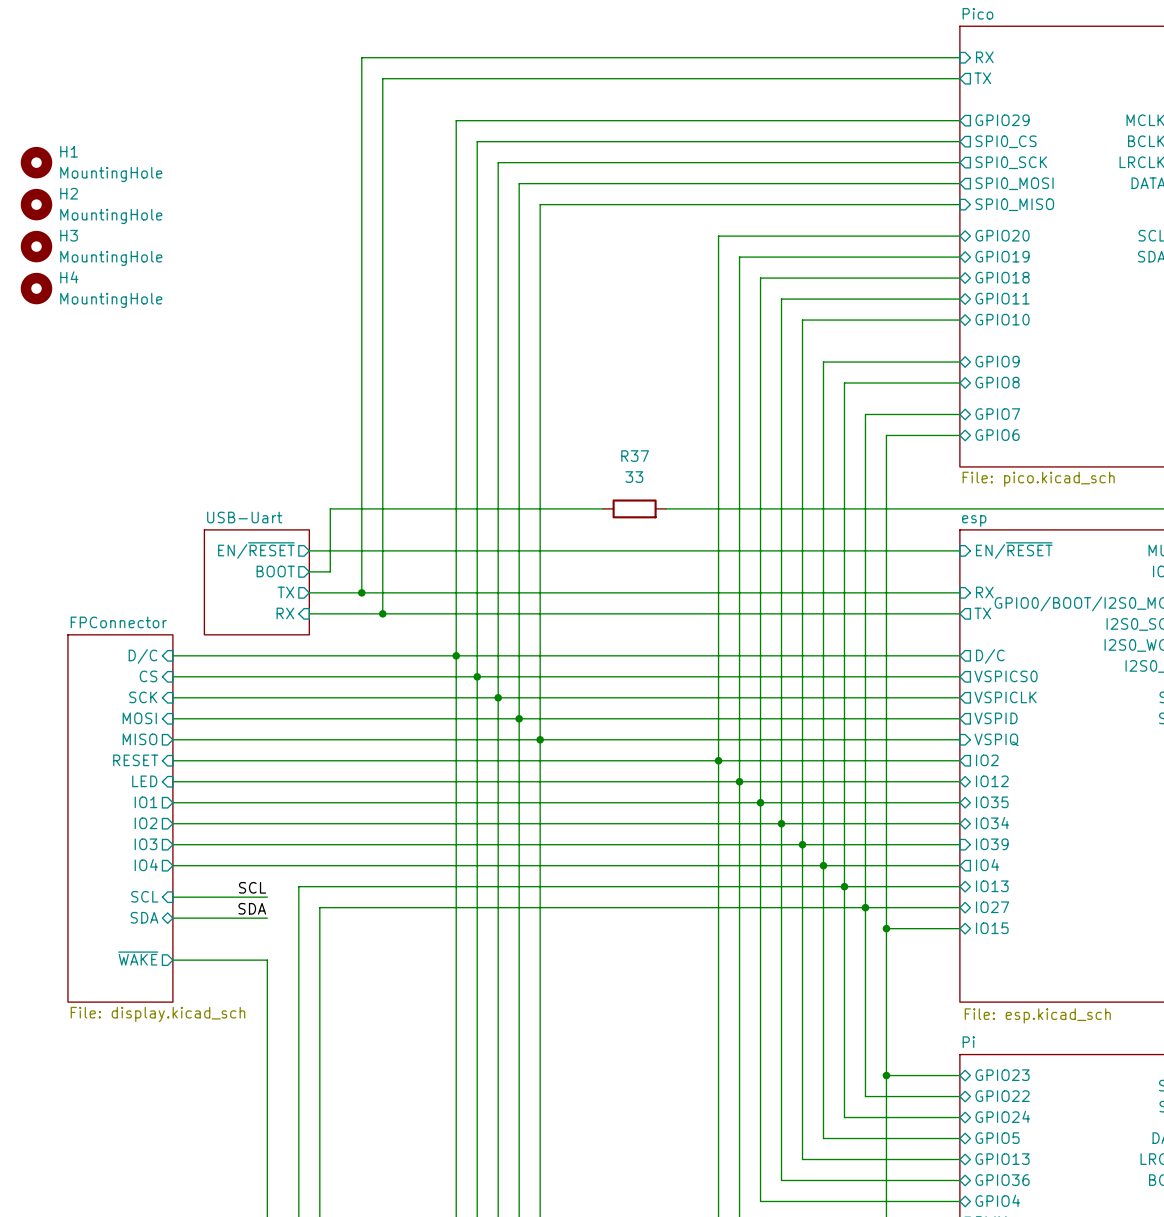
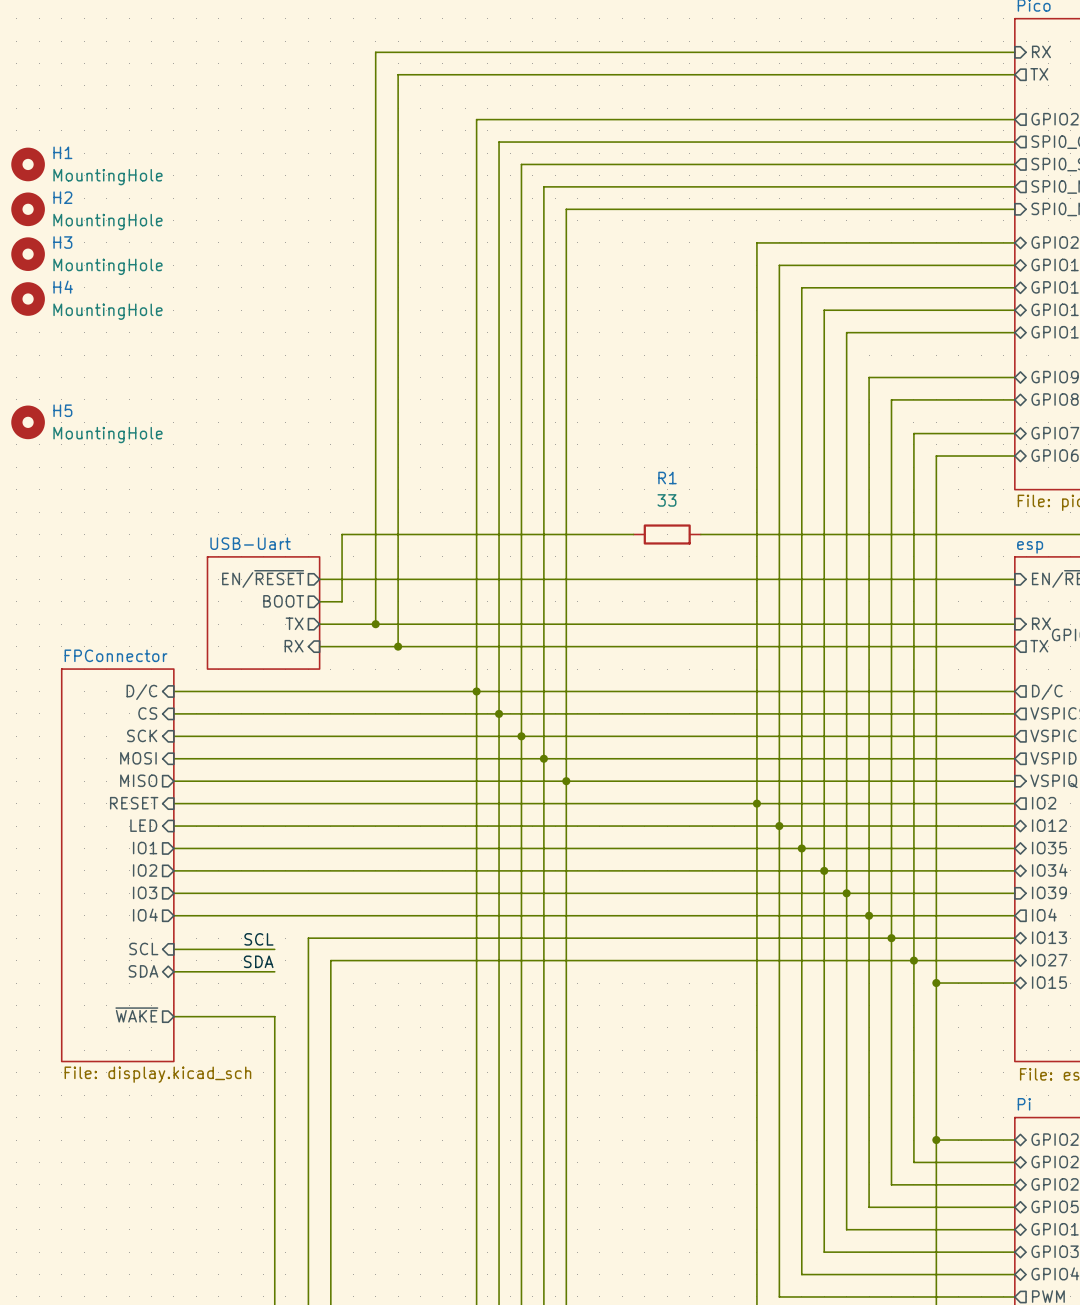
H5: none -> MountingHole (28, 422)
R37 name: R37 (635, 456) -> R1 (667, 478)

